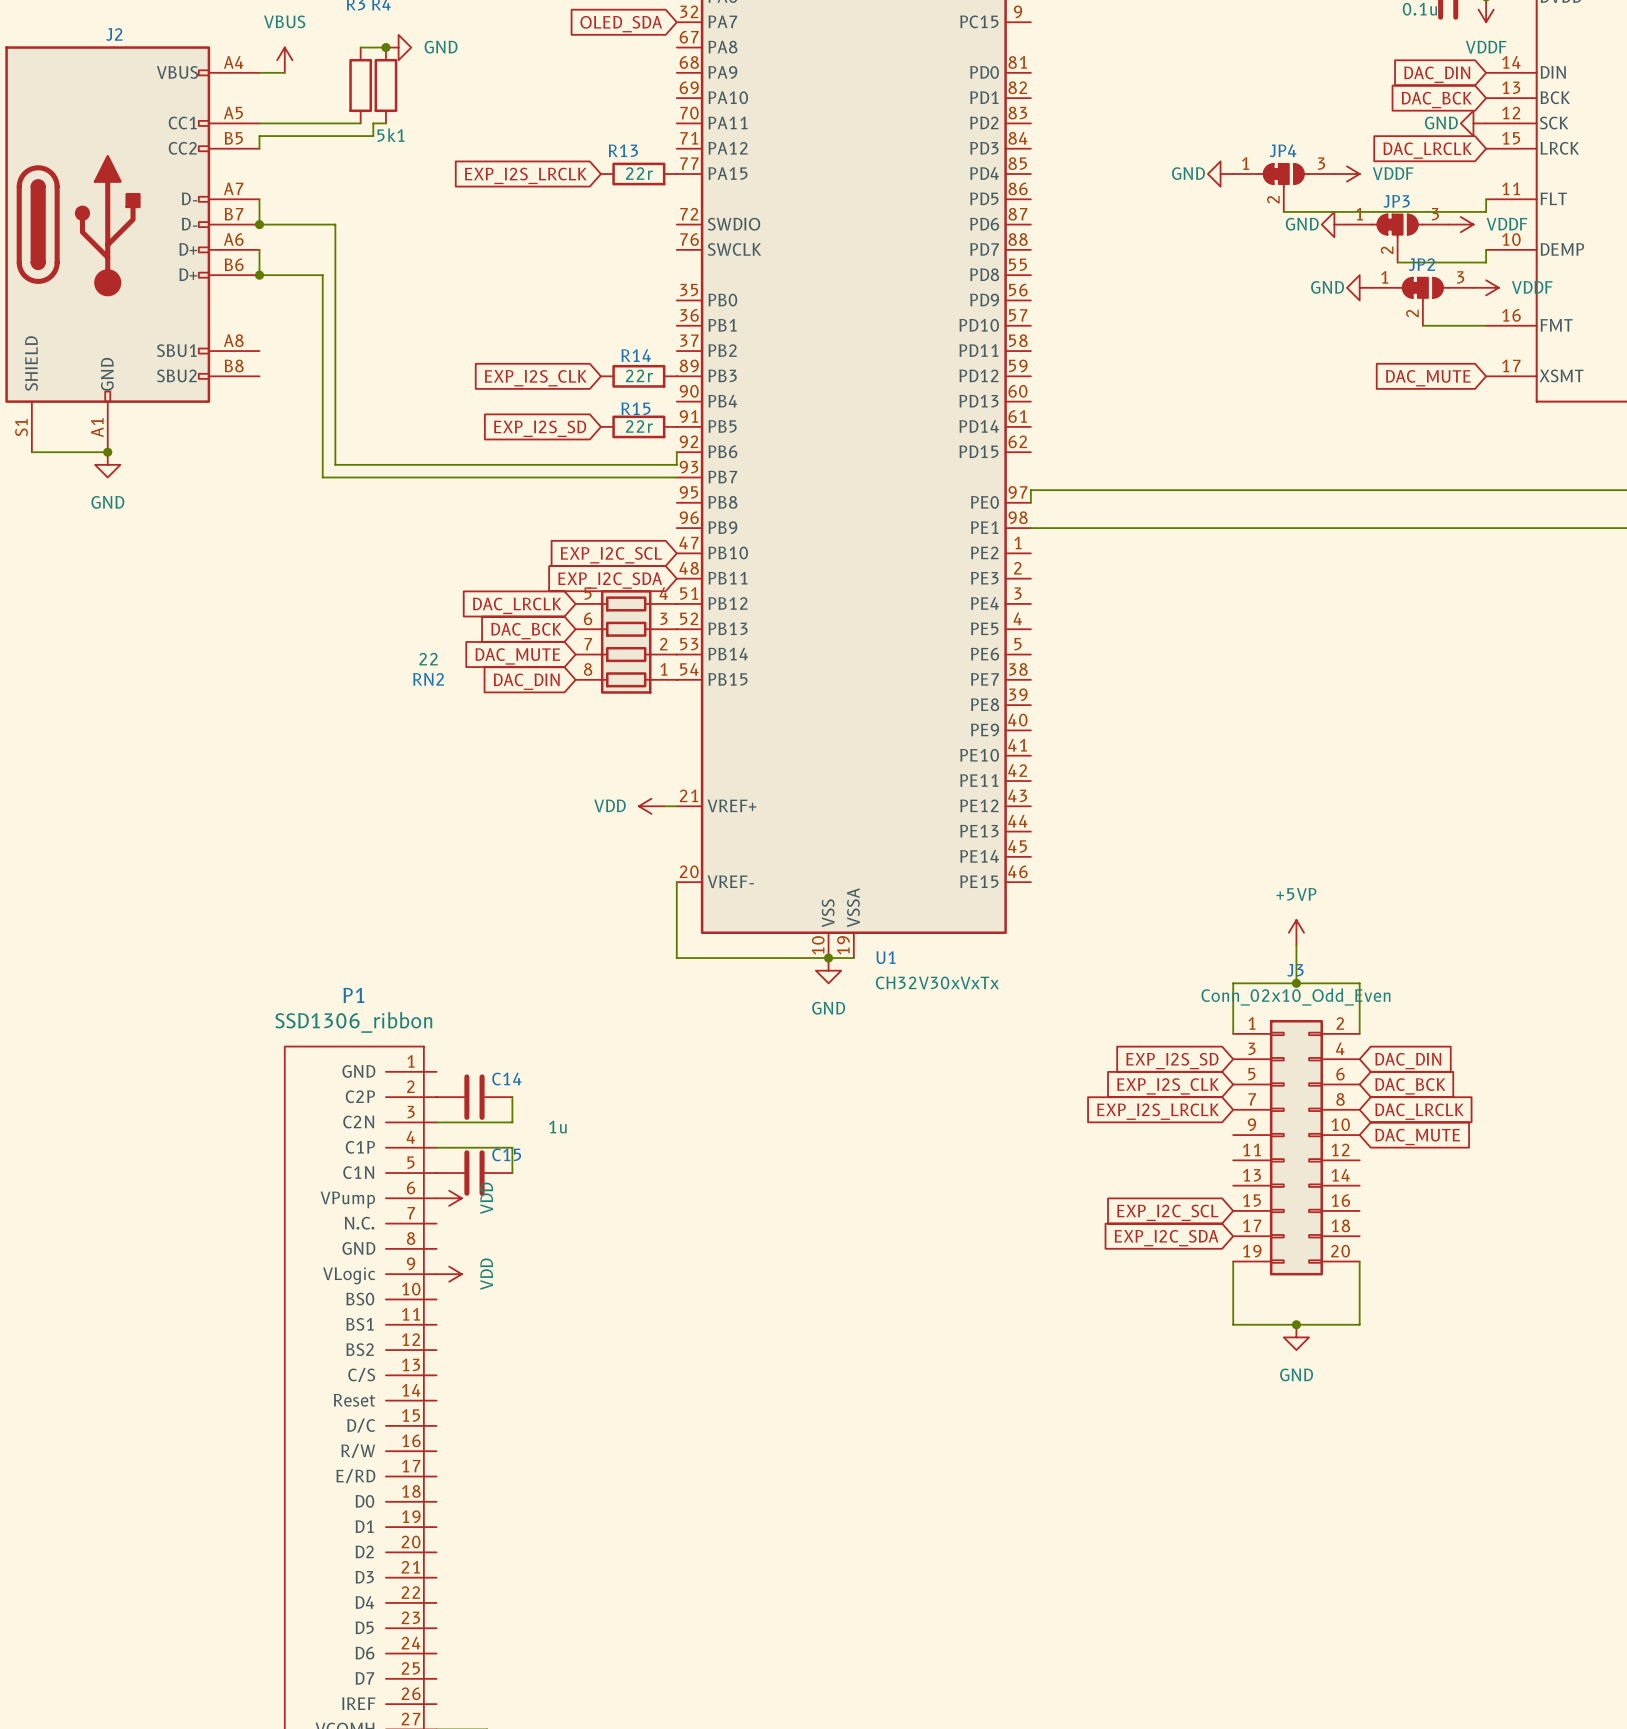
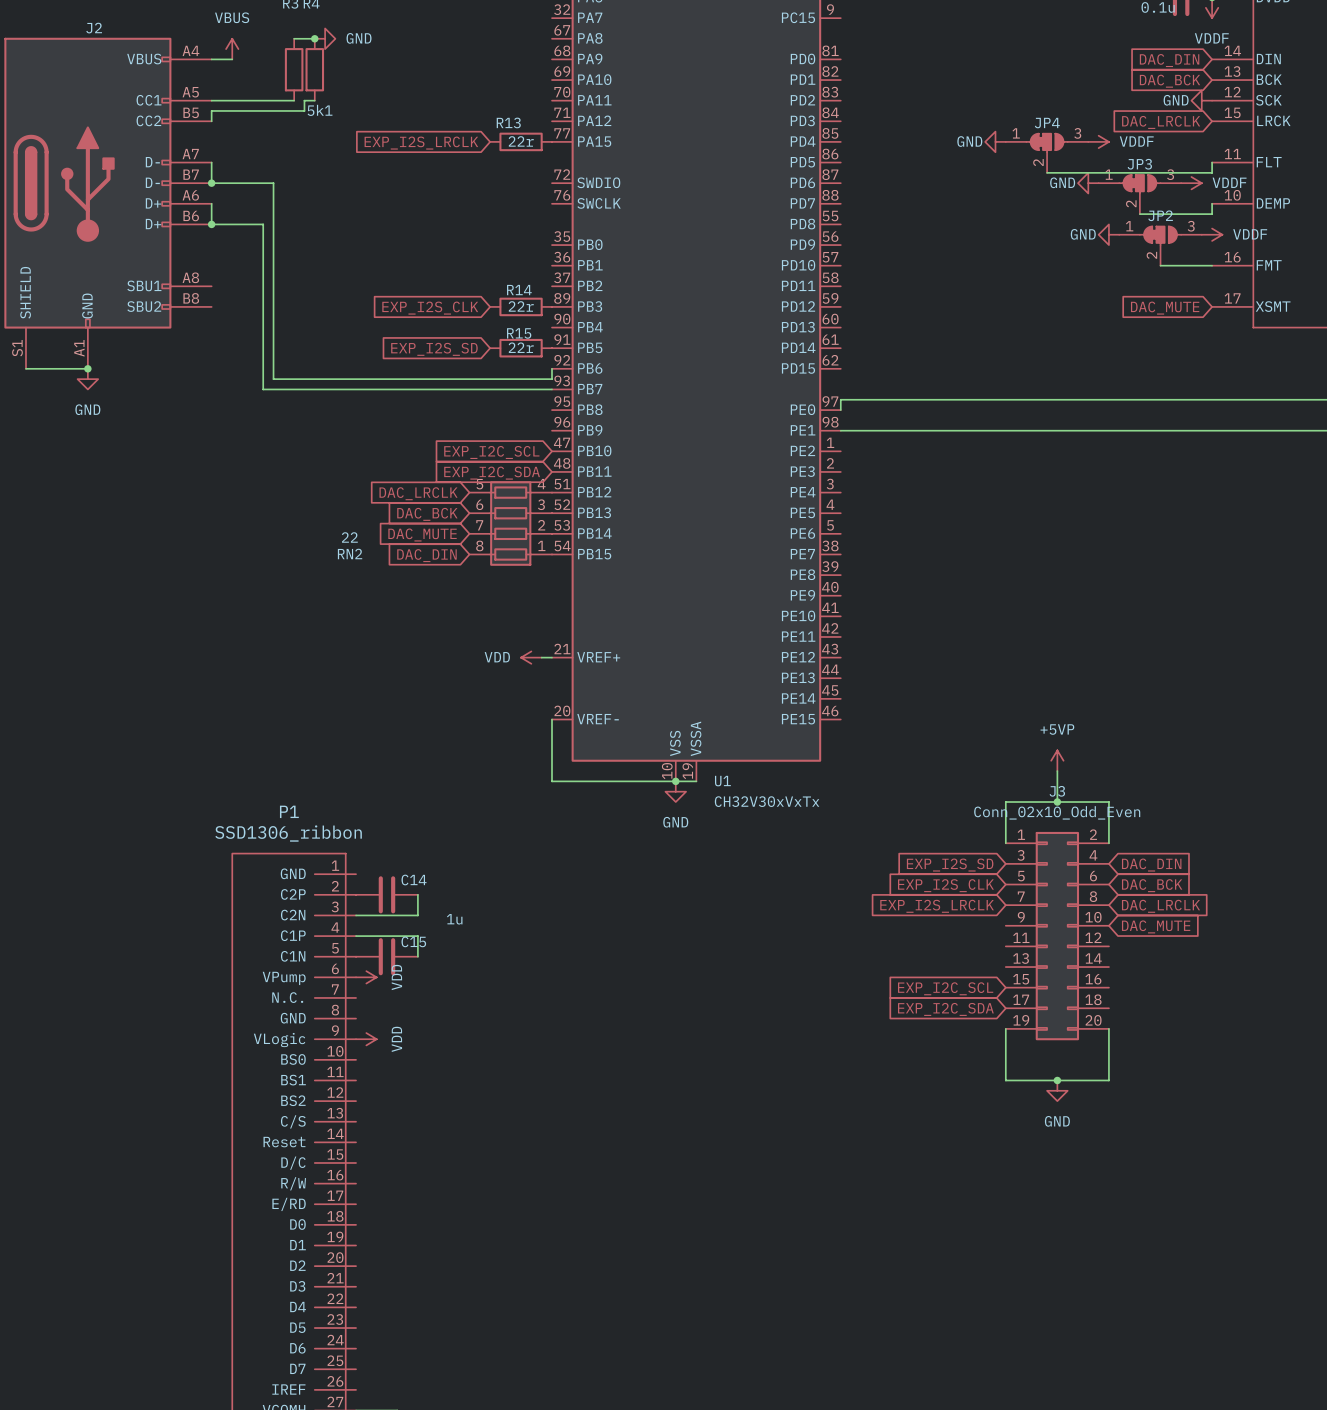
global label: OLED_SDA (621, 24) -> none

